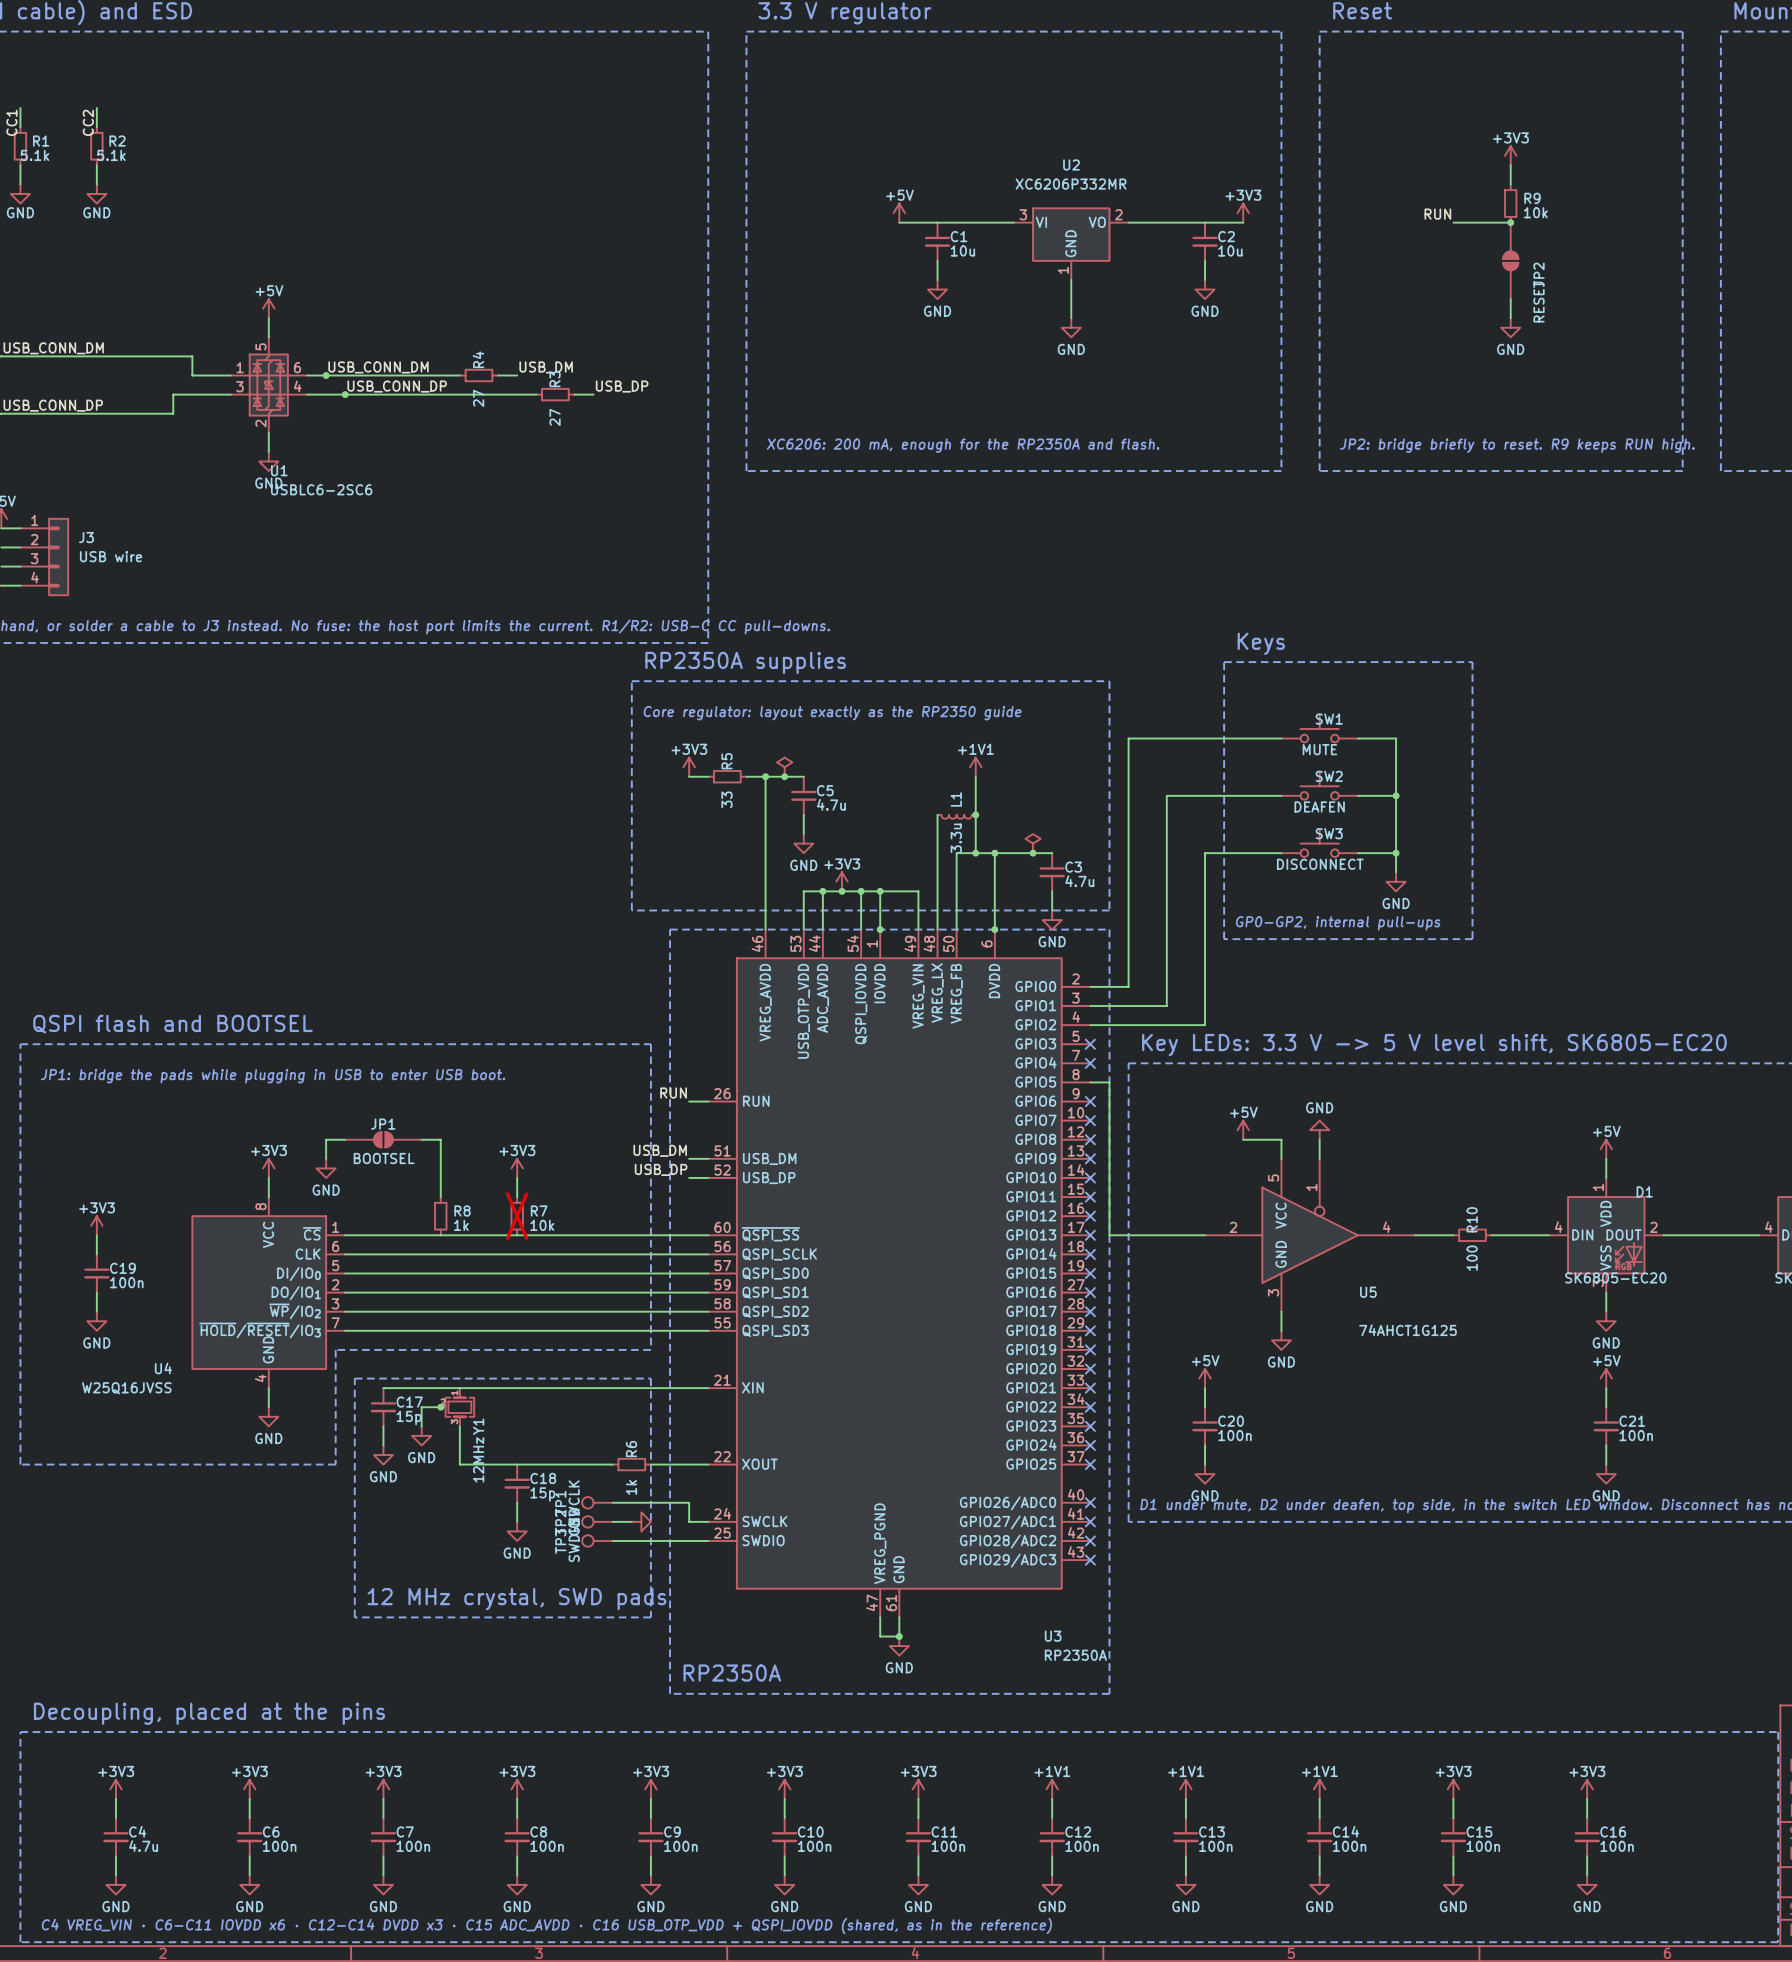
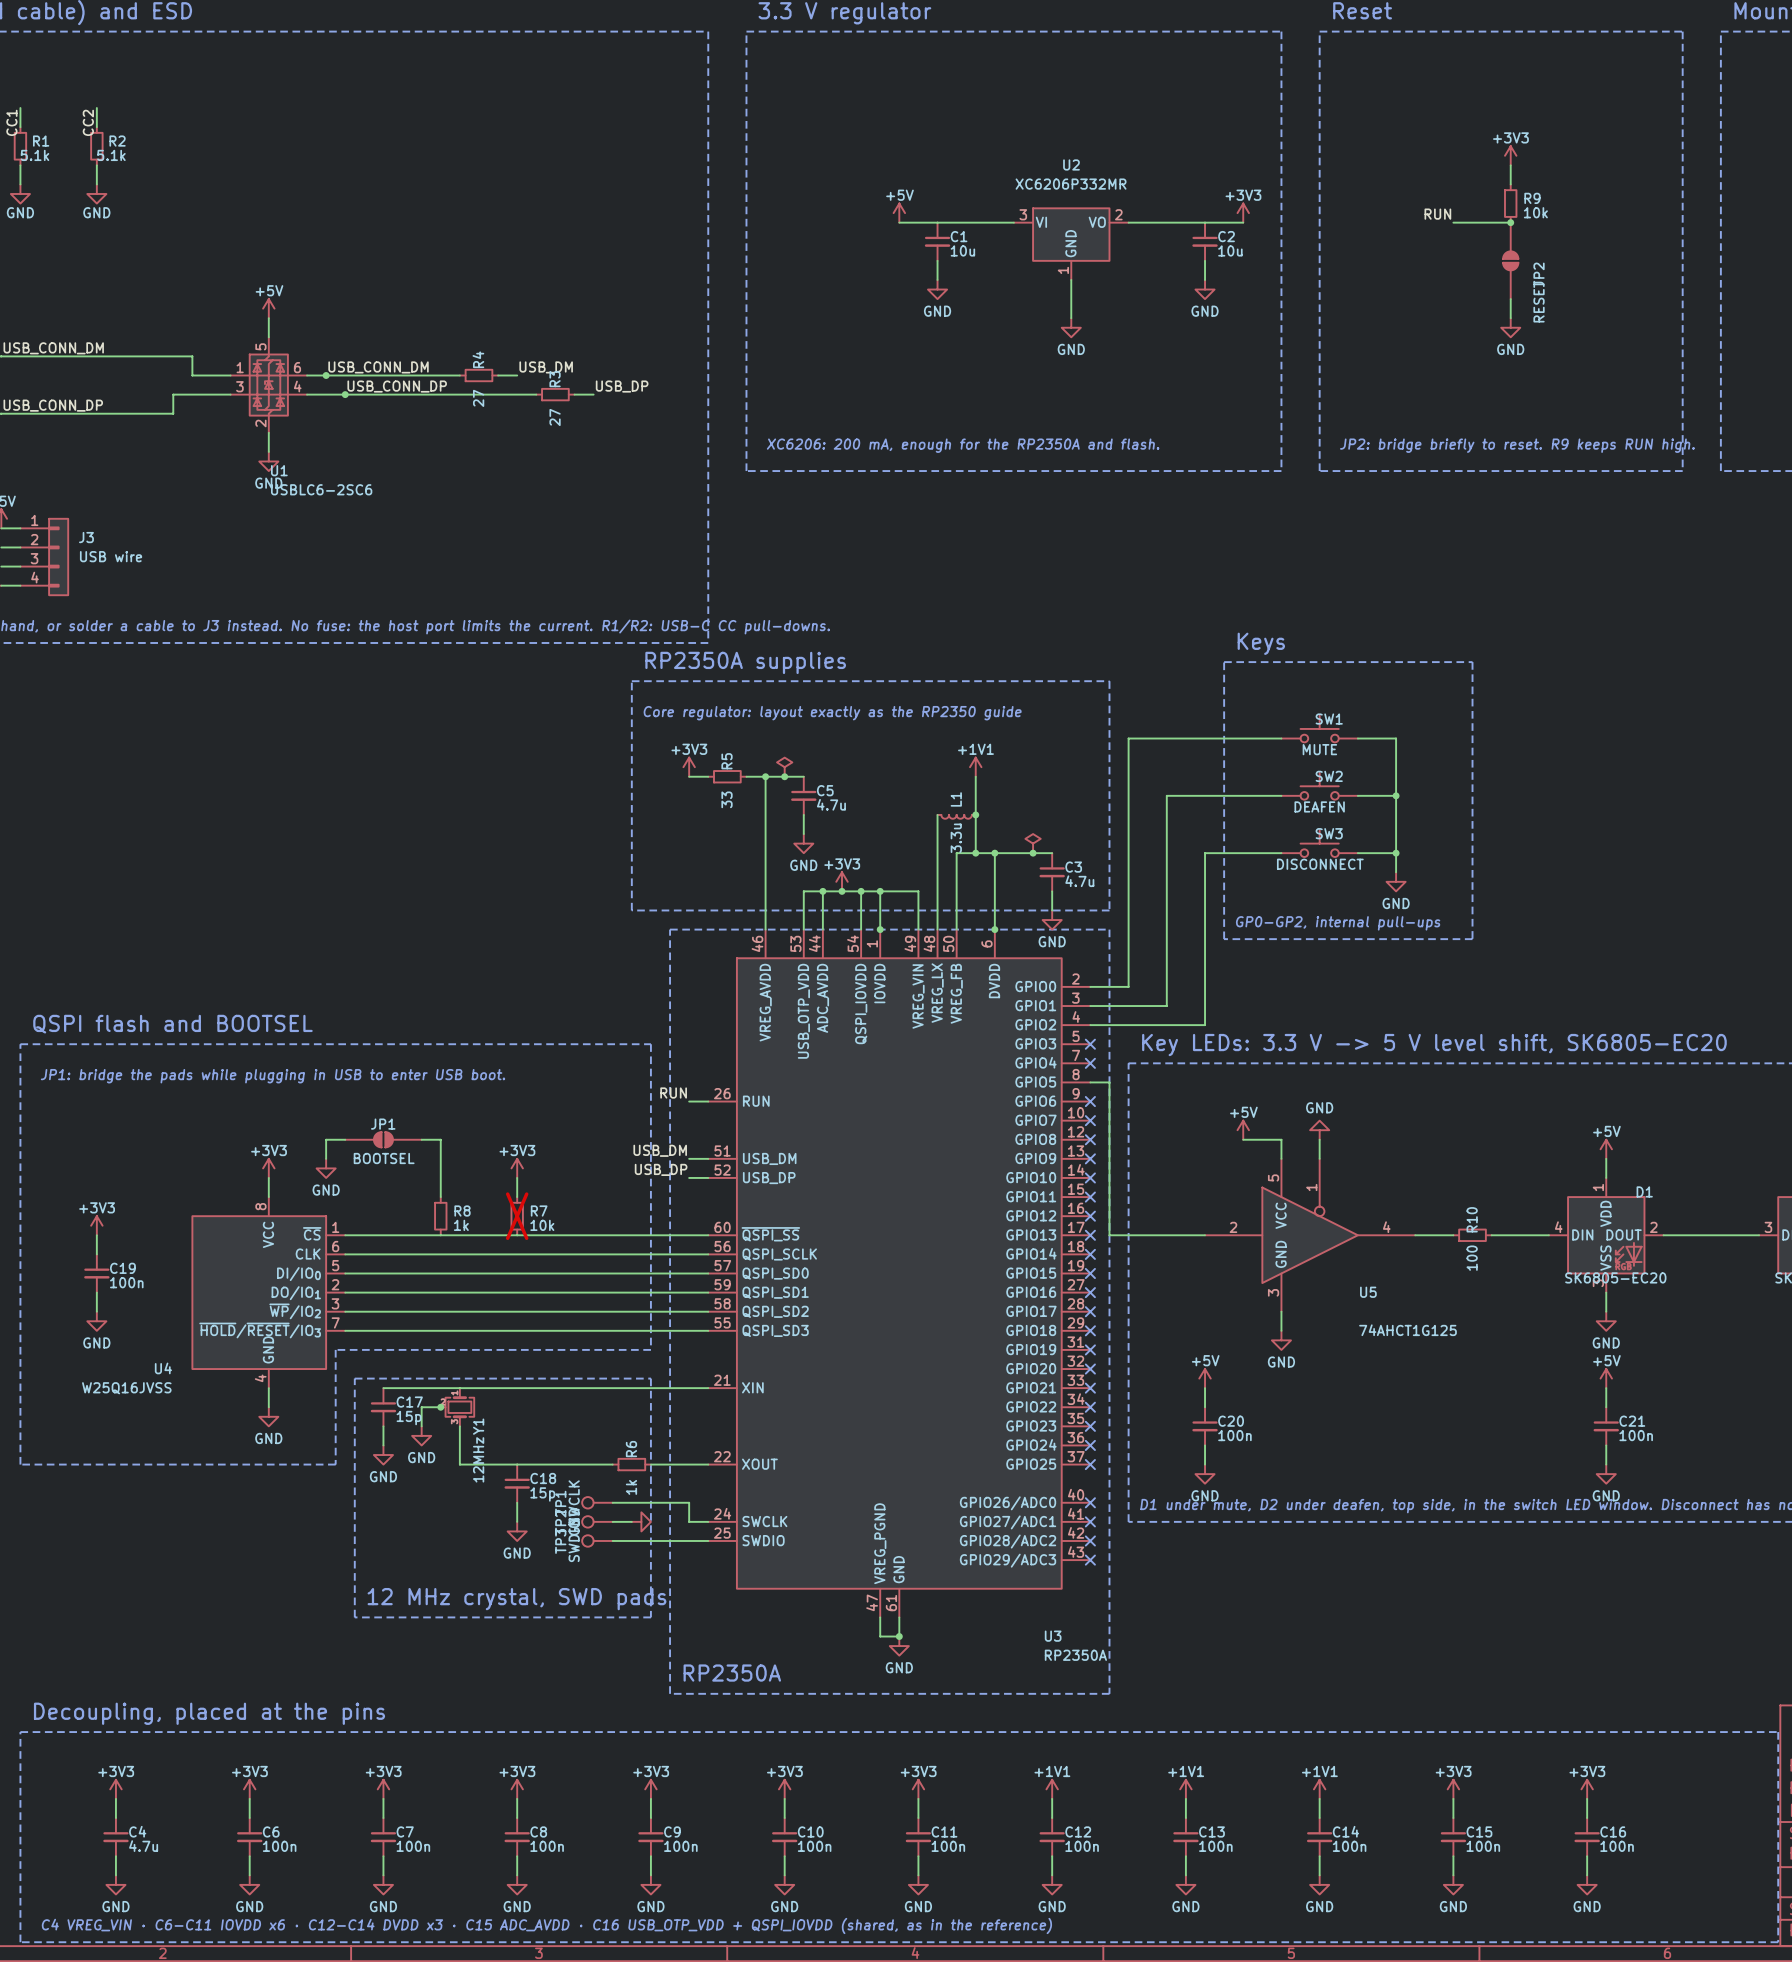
part pin number: 4 (1768, 1227) -> 3 (1768, 1227)

